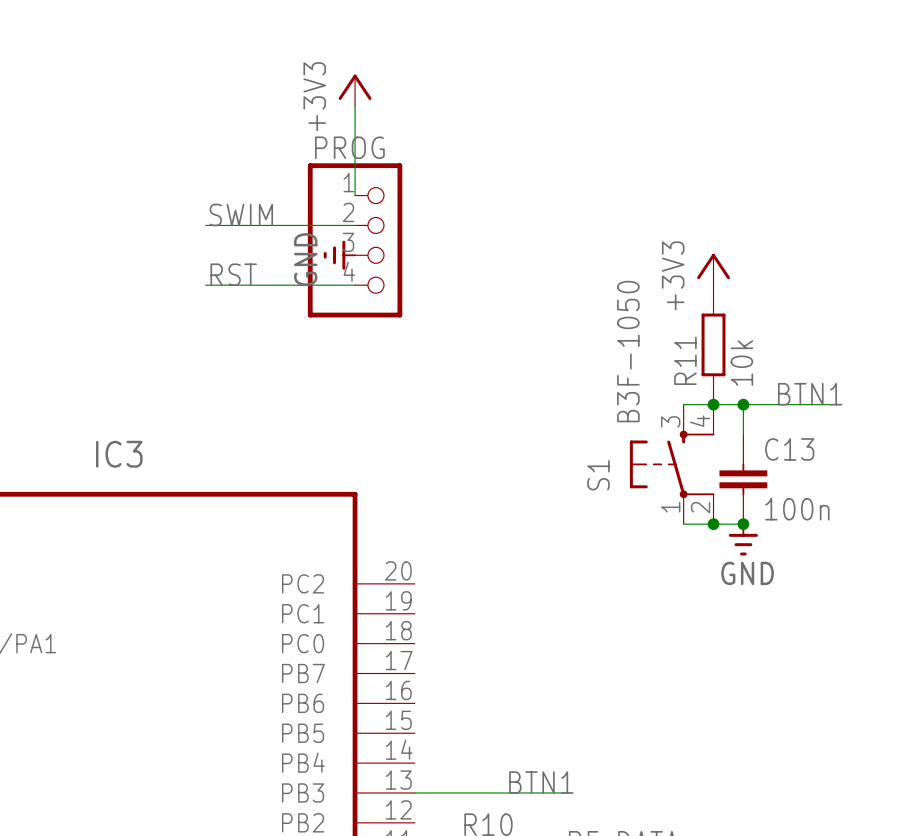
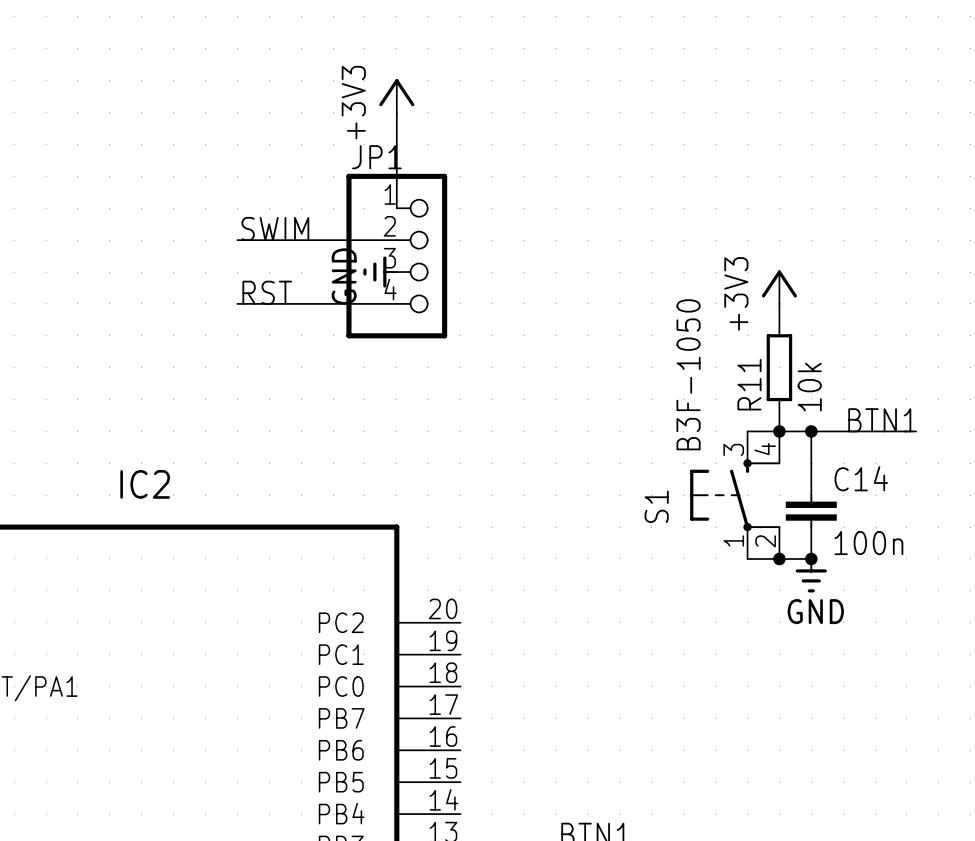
PROG name: PROG (349, 147) -> JP1 (376, 157)
C13 name: C13 (789, 449) -> C14 (861, 478)
IC3 name: IC3 (119, 454) -> IC2 (145, 484)

